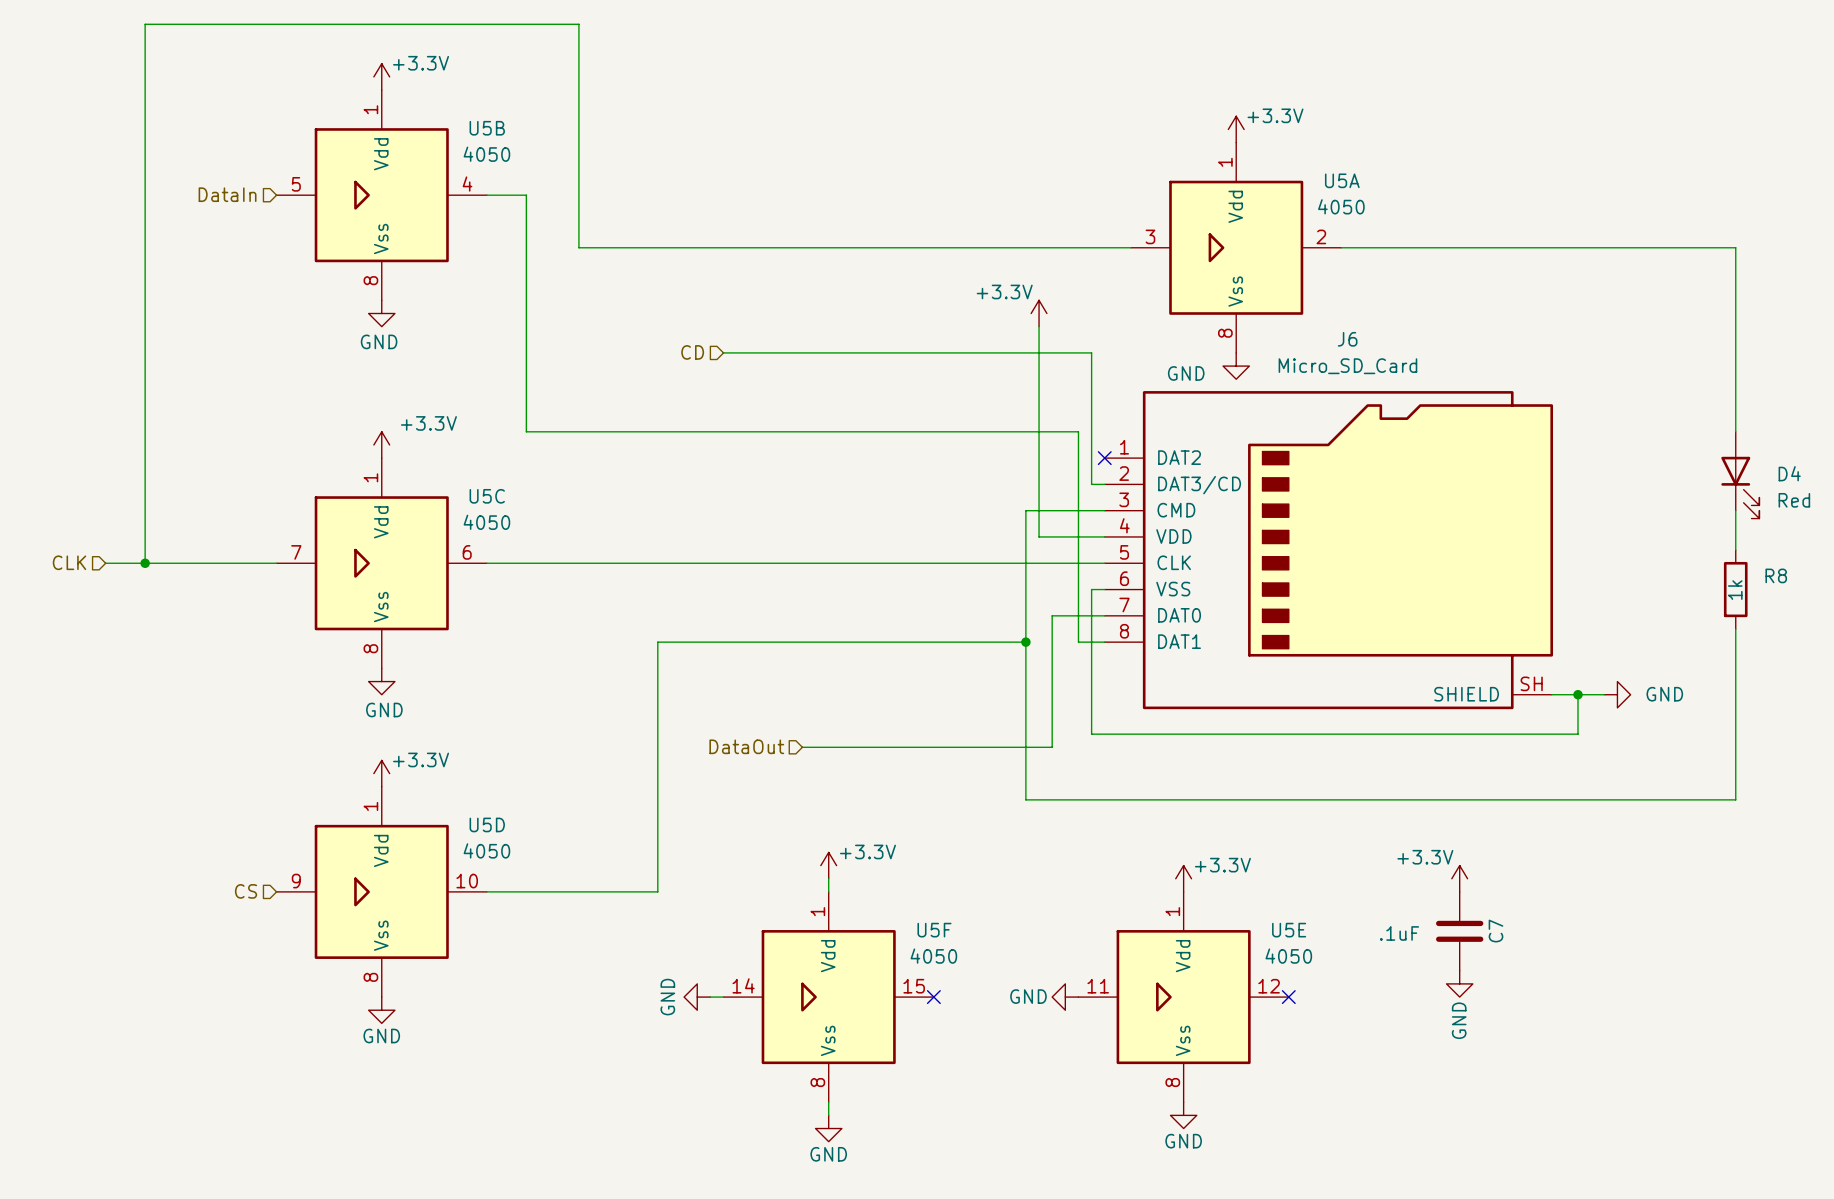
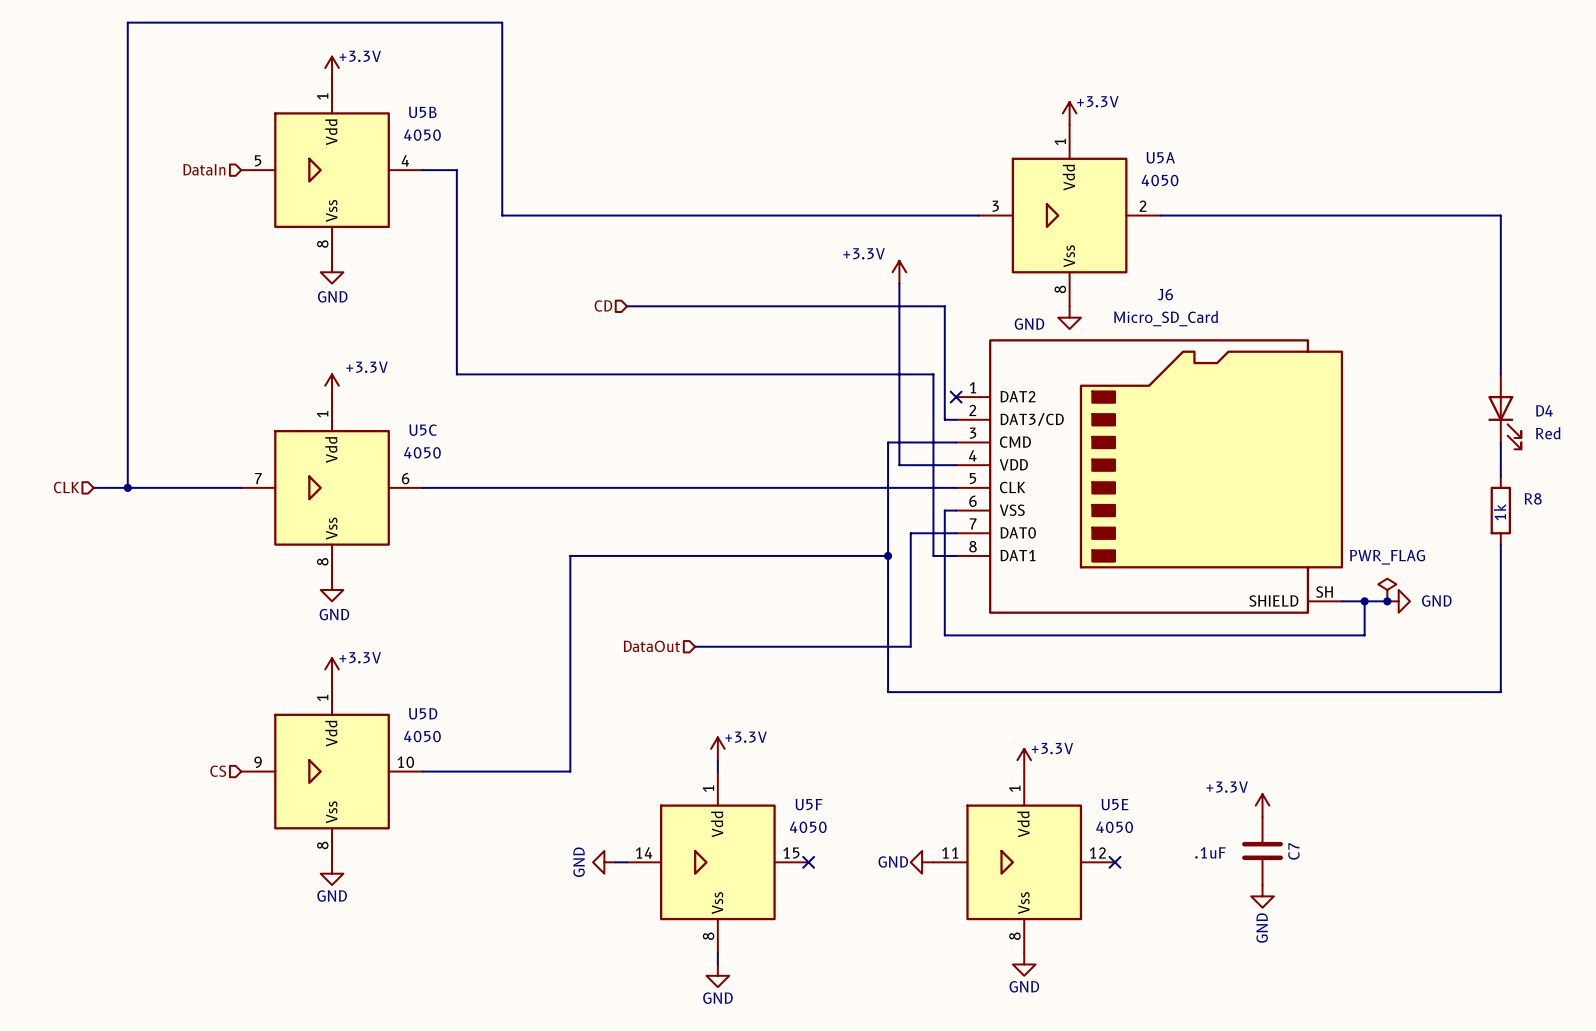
power symbol: none -> PWR_FLAG (1387, 590)
junction: none -> (1387, 601)
power symbol position: +3.3V (1459, 878) -> +3.3V (1262, 805)
C7 position: (1459, 931) -> (1262, 850)
power symbol position: GND (1459, 983) -> GND (1262, 896)

